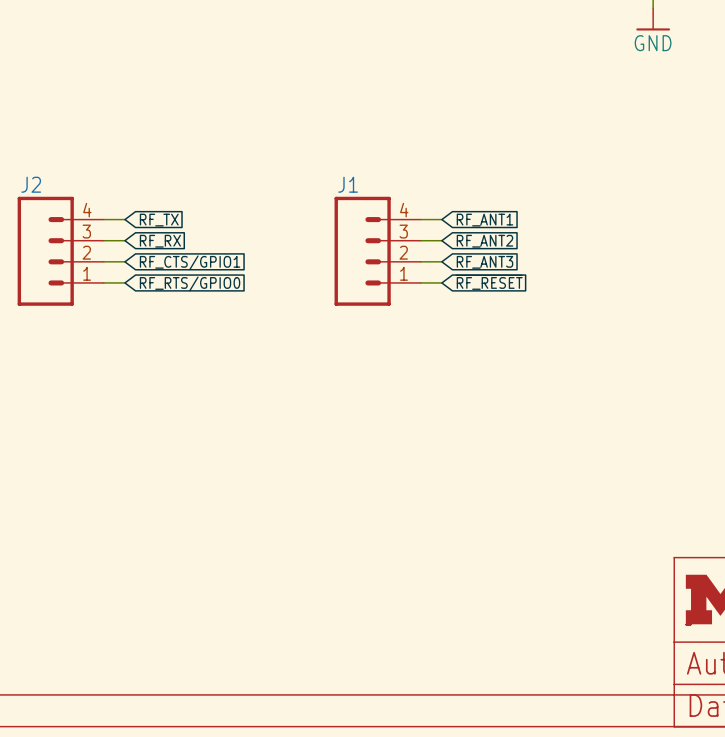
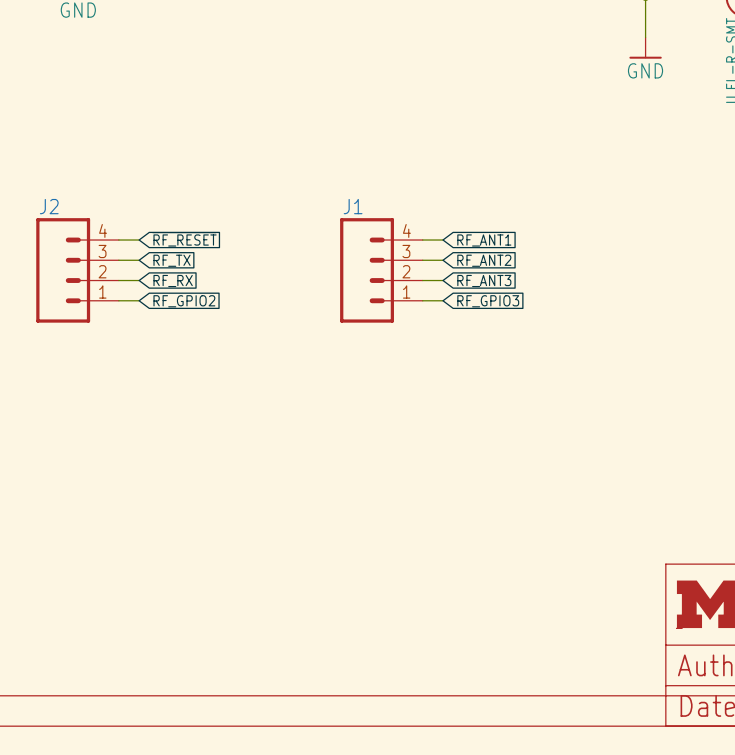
global label: RF_TX (159, 220) -> ~{RF_RESET} (184, 239)
global label: RF_RX (160, 241) -> RF_TX (172, 260)
global label: RF_CTS/GPIO1 (190, 262) -> RF_RX (173, 281)
global label: ~{RF_RESET} (489, 282) -> RF_GPIO3 (488, 301)
global label: RF_RTS/GPIO0 (190, 283) -> RF_GPIO2 (184, 301)

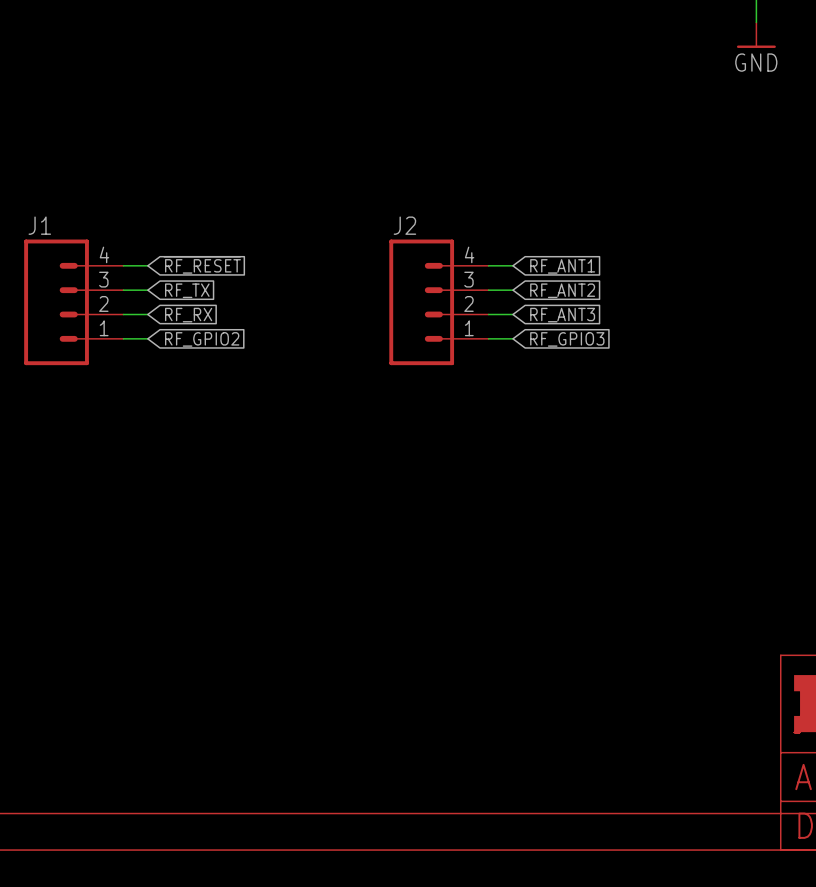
J2 name: J2 (49, 206) -> J1 (39, 225)
J1 name: J1 (353, 206) -> J2 (404, 225)

